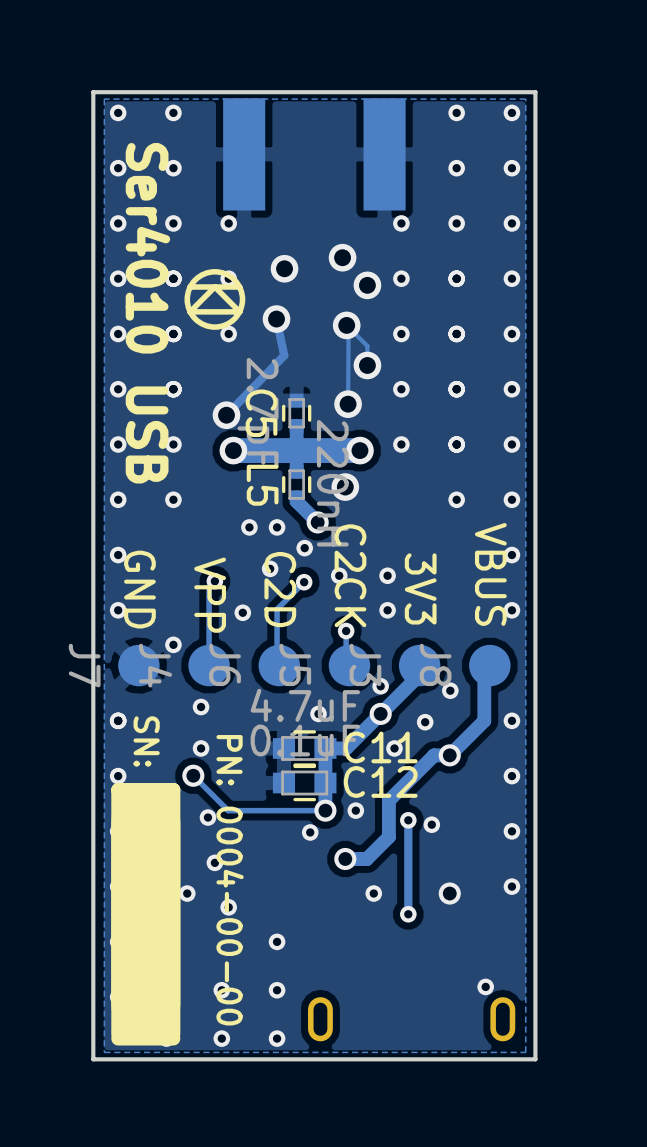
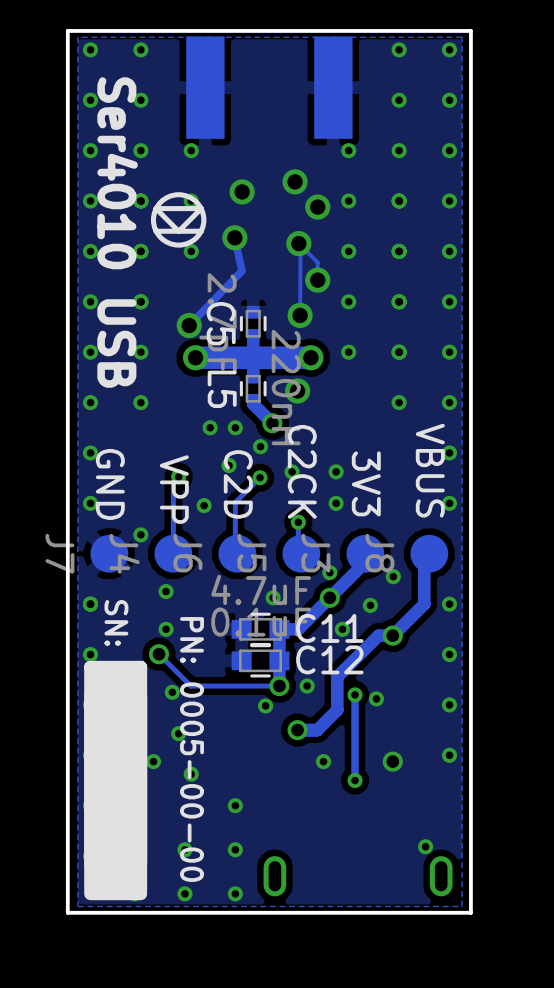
drawing shape: [184, 269, 246, 330] -> [150, 192, 207, 248]
text: PN: 0004-00-00 (230, 880) -> PN: 0005-00-00 (192, 749)

